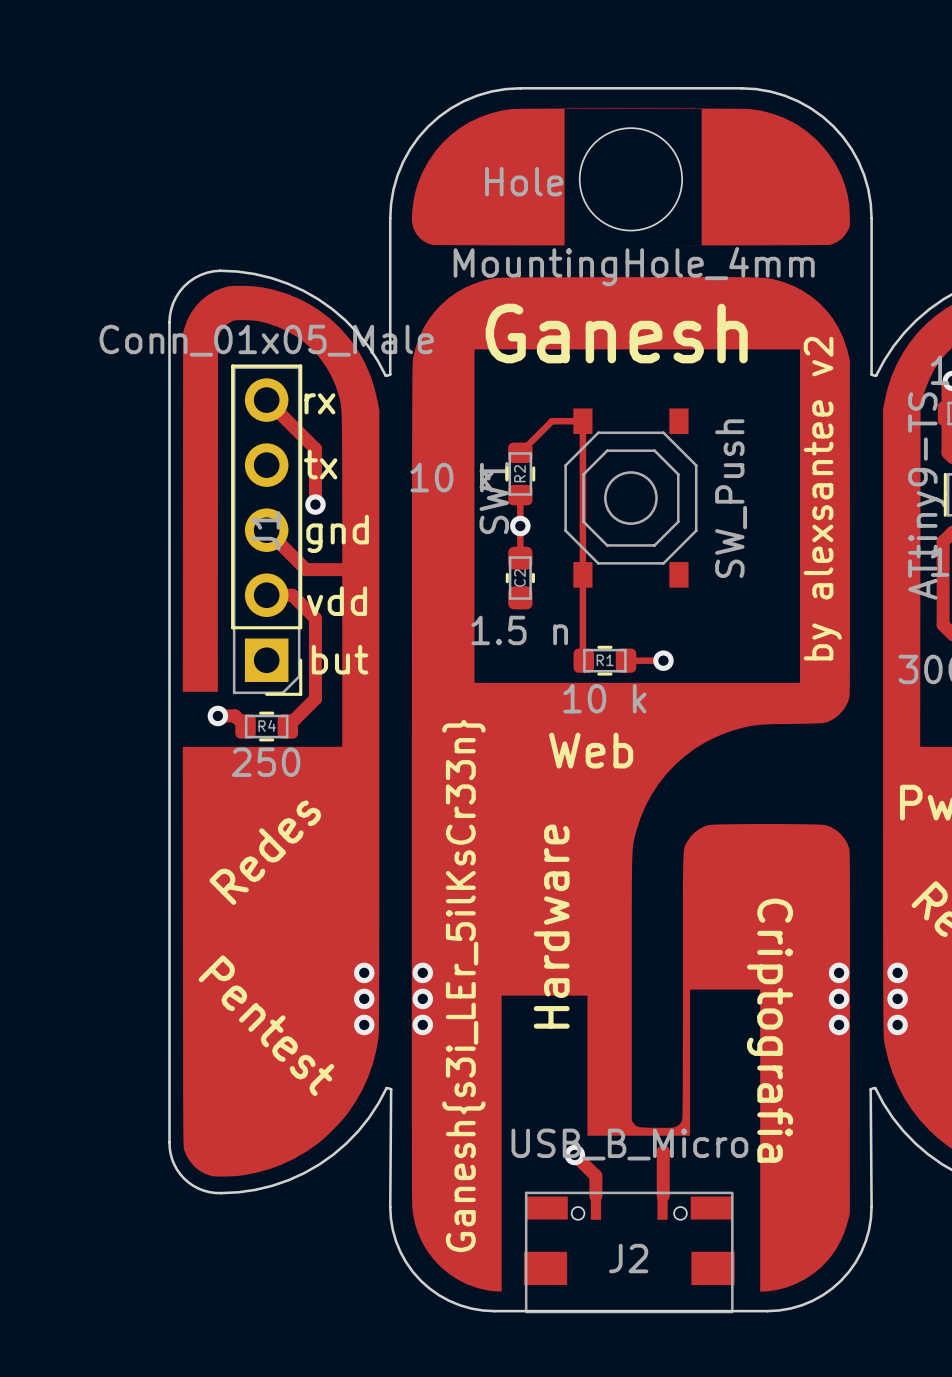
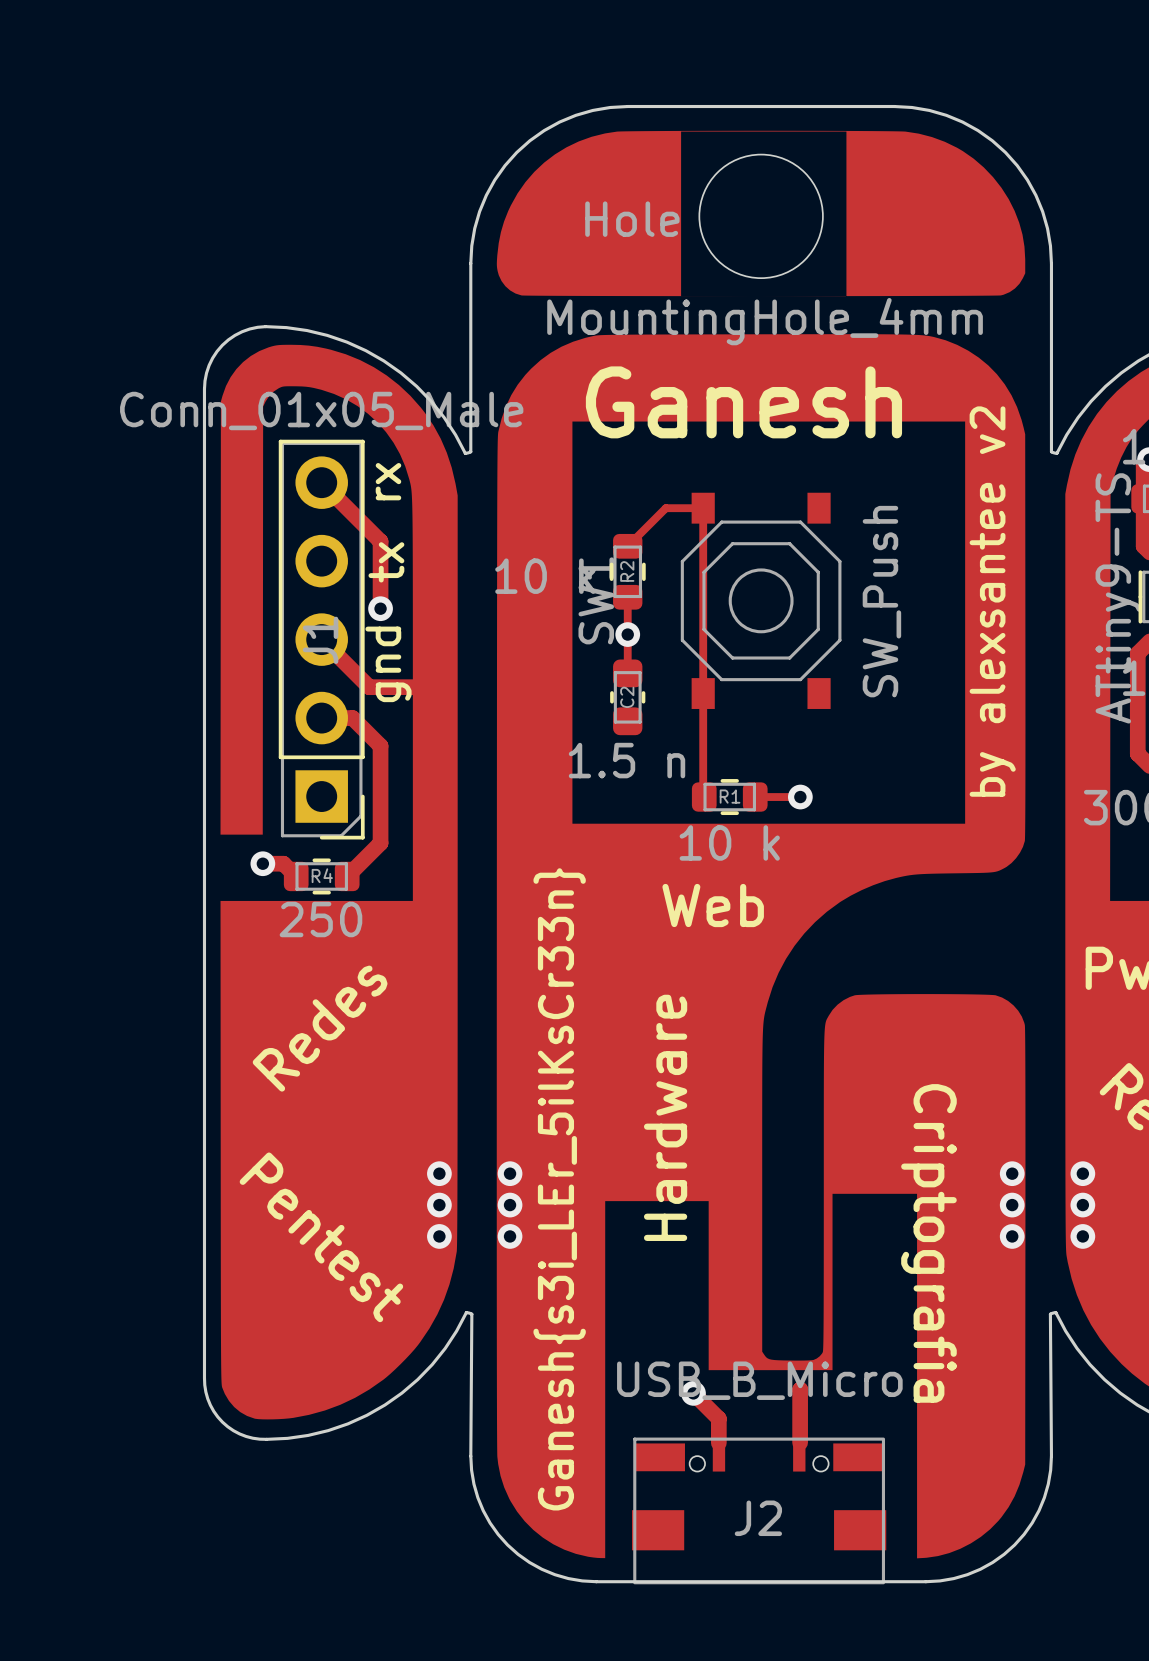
text rotation: 0° (319, 403) -> 90° counterclockwise (388, 481)
text rotation: 0° (320, 464) -> 90° counterclockwise (386, 562)
text rotation: 0° (337, 533) -> 90° counterclockwise (388, 664)
text: vdd (337, 601) -> none
text: but (340, 659) -> none

